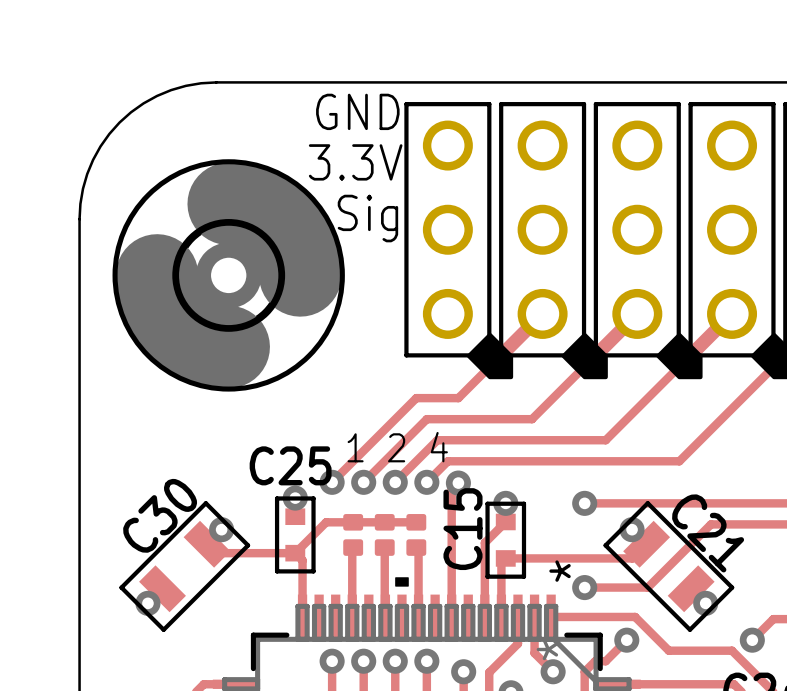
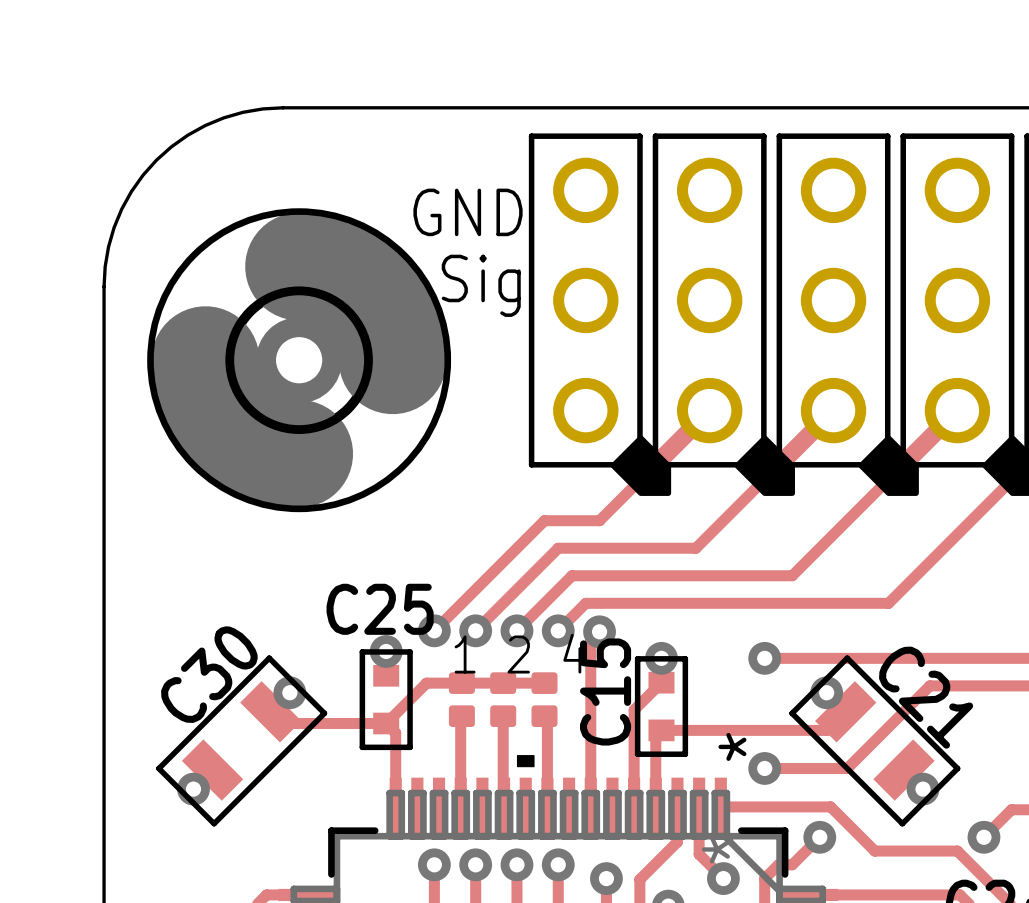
text position: GND (357, 111) -> GND (468, 212)
text: 3.3V (355, 162) -> none
text position: 1 2 4 (397, 447) -> 1 2 4 (520, 653)

